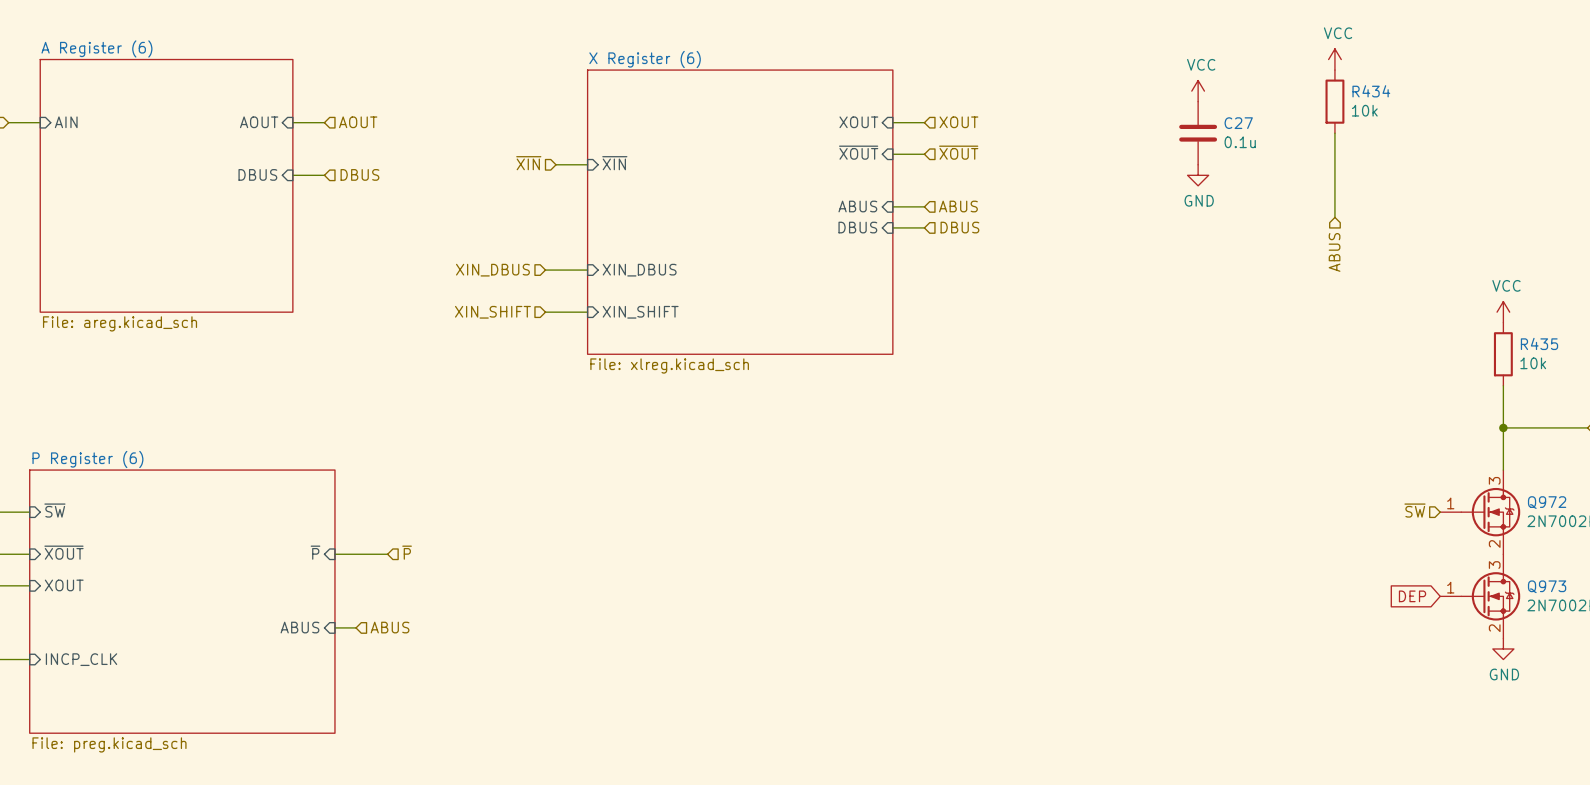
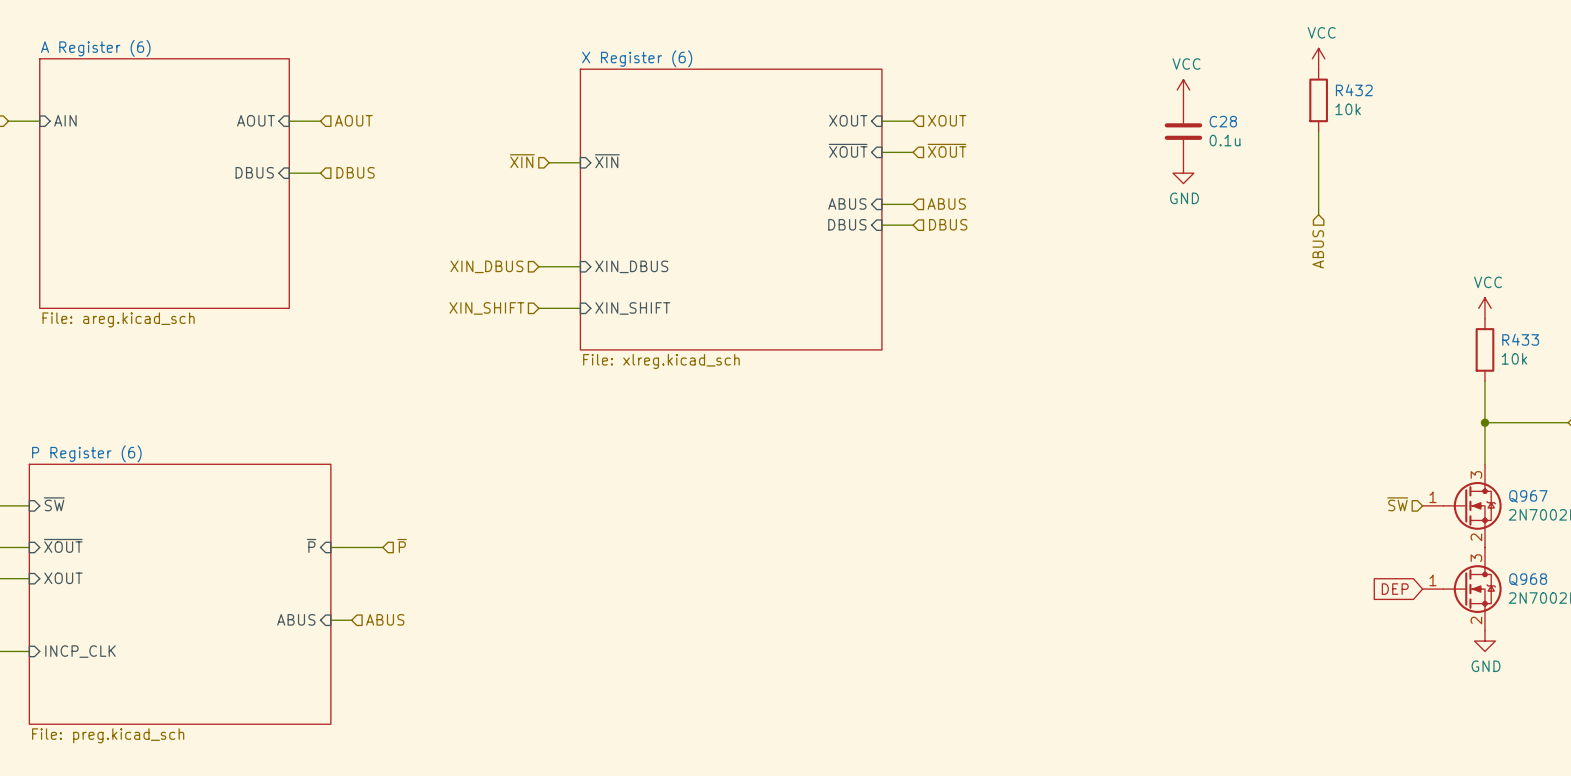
R434 name: R434 (1371, 91) -> R432 (1354, 90)
C27 name: C27 (1238, 123) -> C28 (1223, 121)
R435 name: R435 (1539, 343) -> R433 (1520, 339)
Q972 name: Q972 (1547, 502) -> Q967 (1528, 496)
Q973 name: Q973 (1547, 586) -> Q968 (1528, 579)

